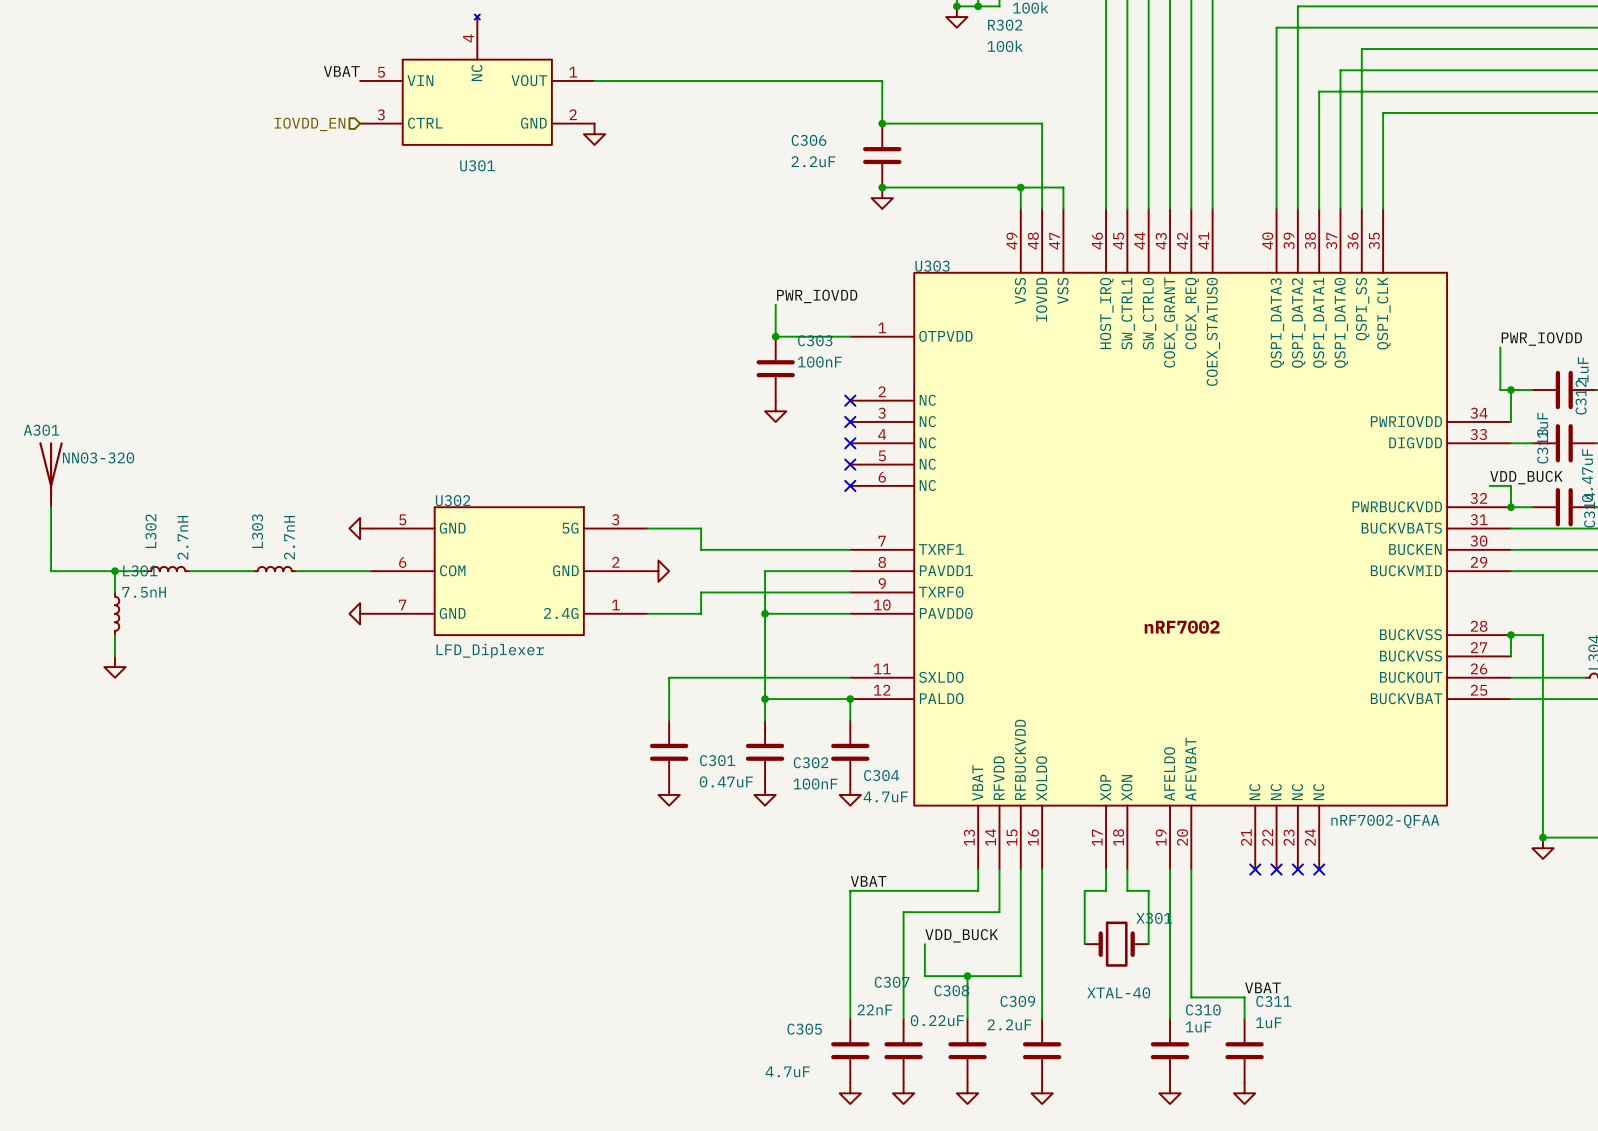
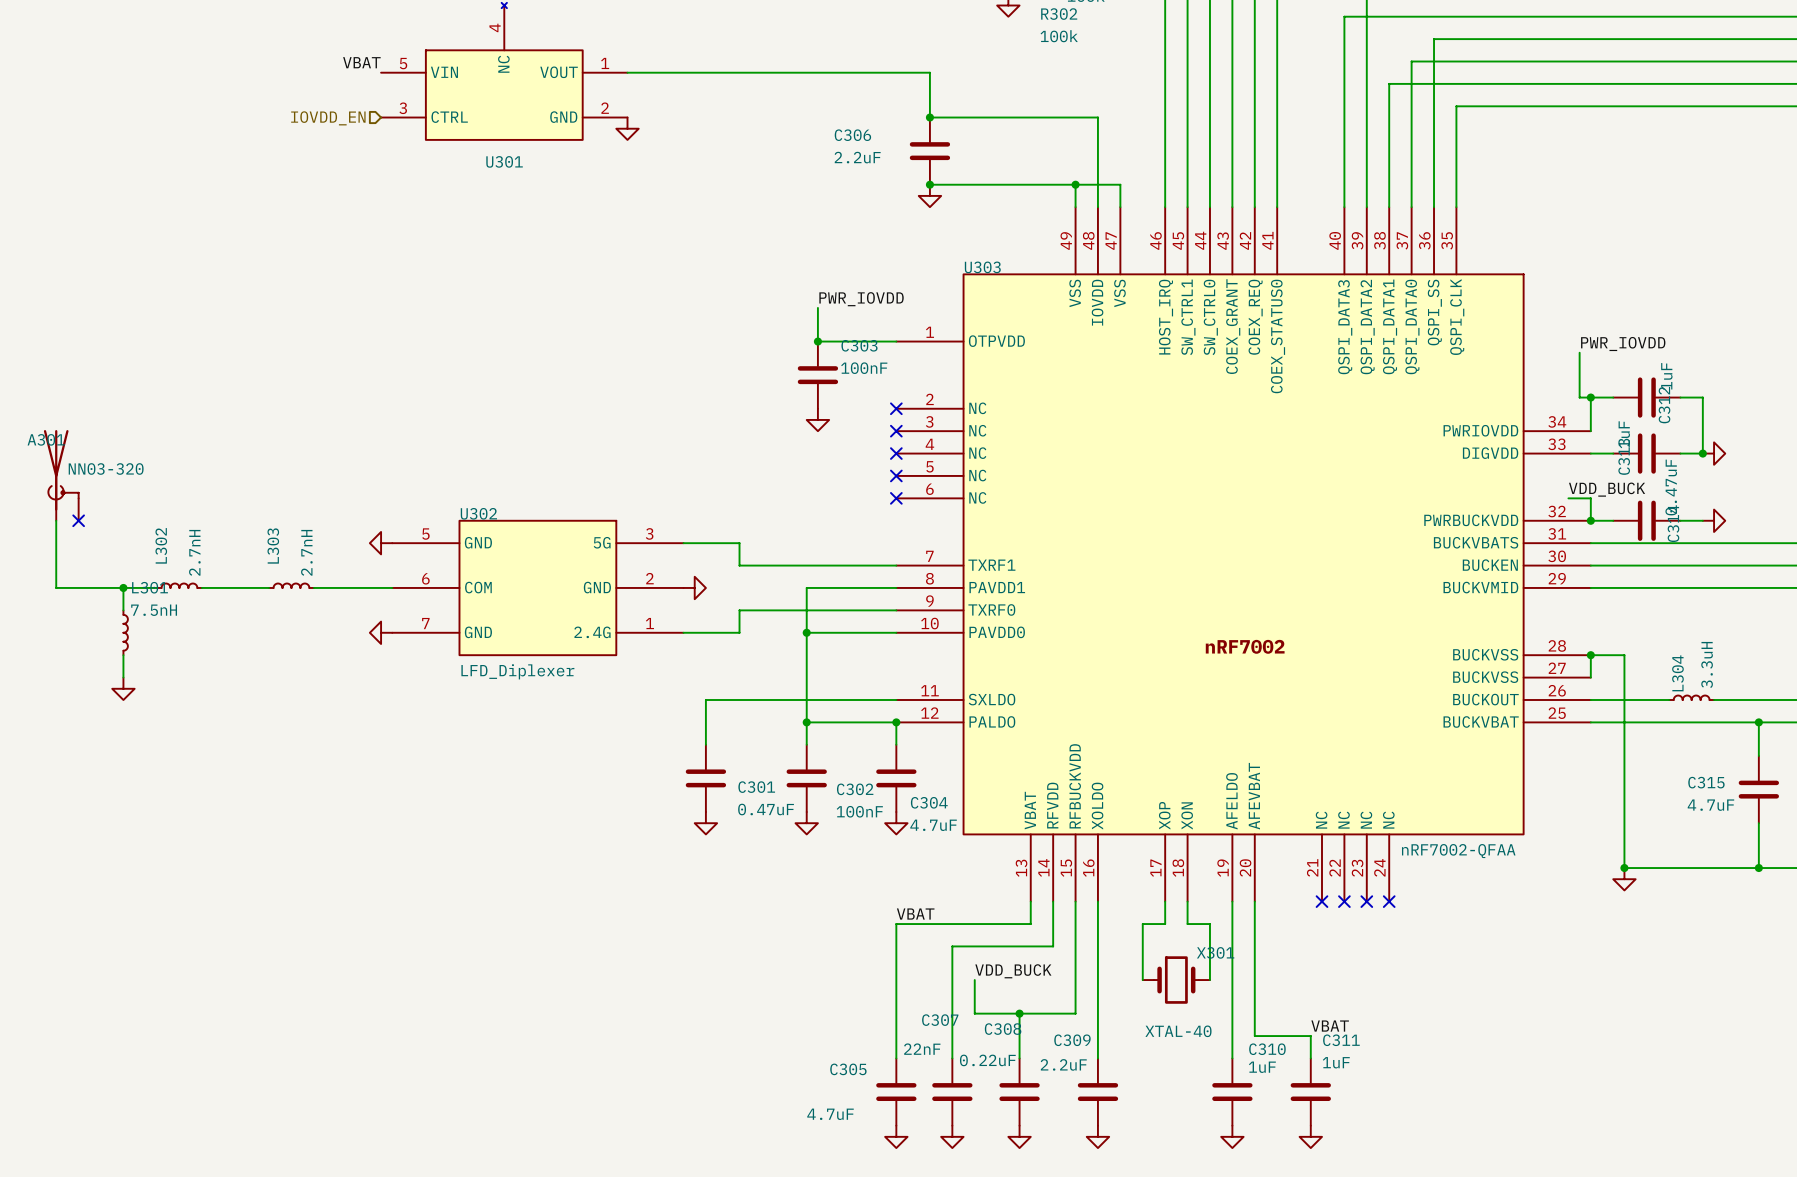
A301 symbol: [39, 442, 63, 508] -> [43, 430, 79, 521]
no-connect mark: none -> (78, 520)

